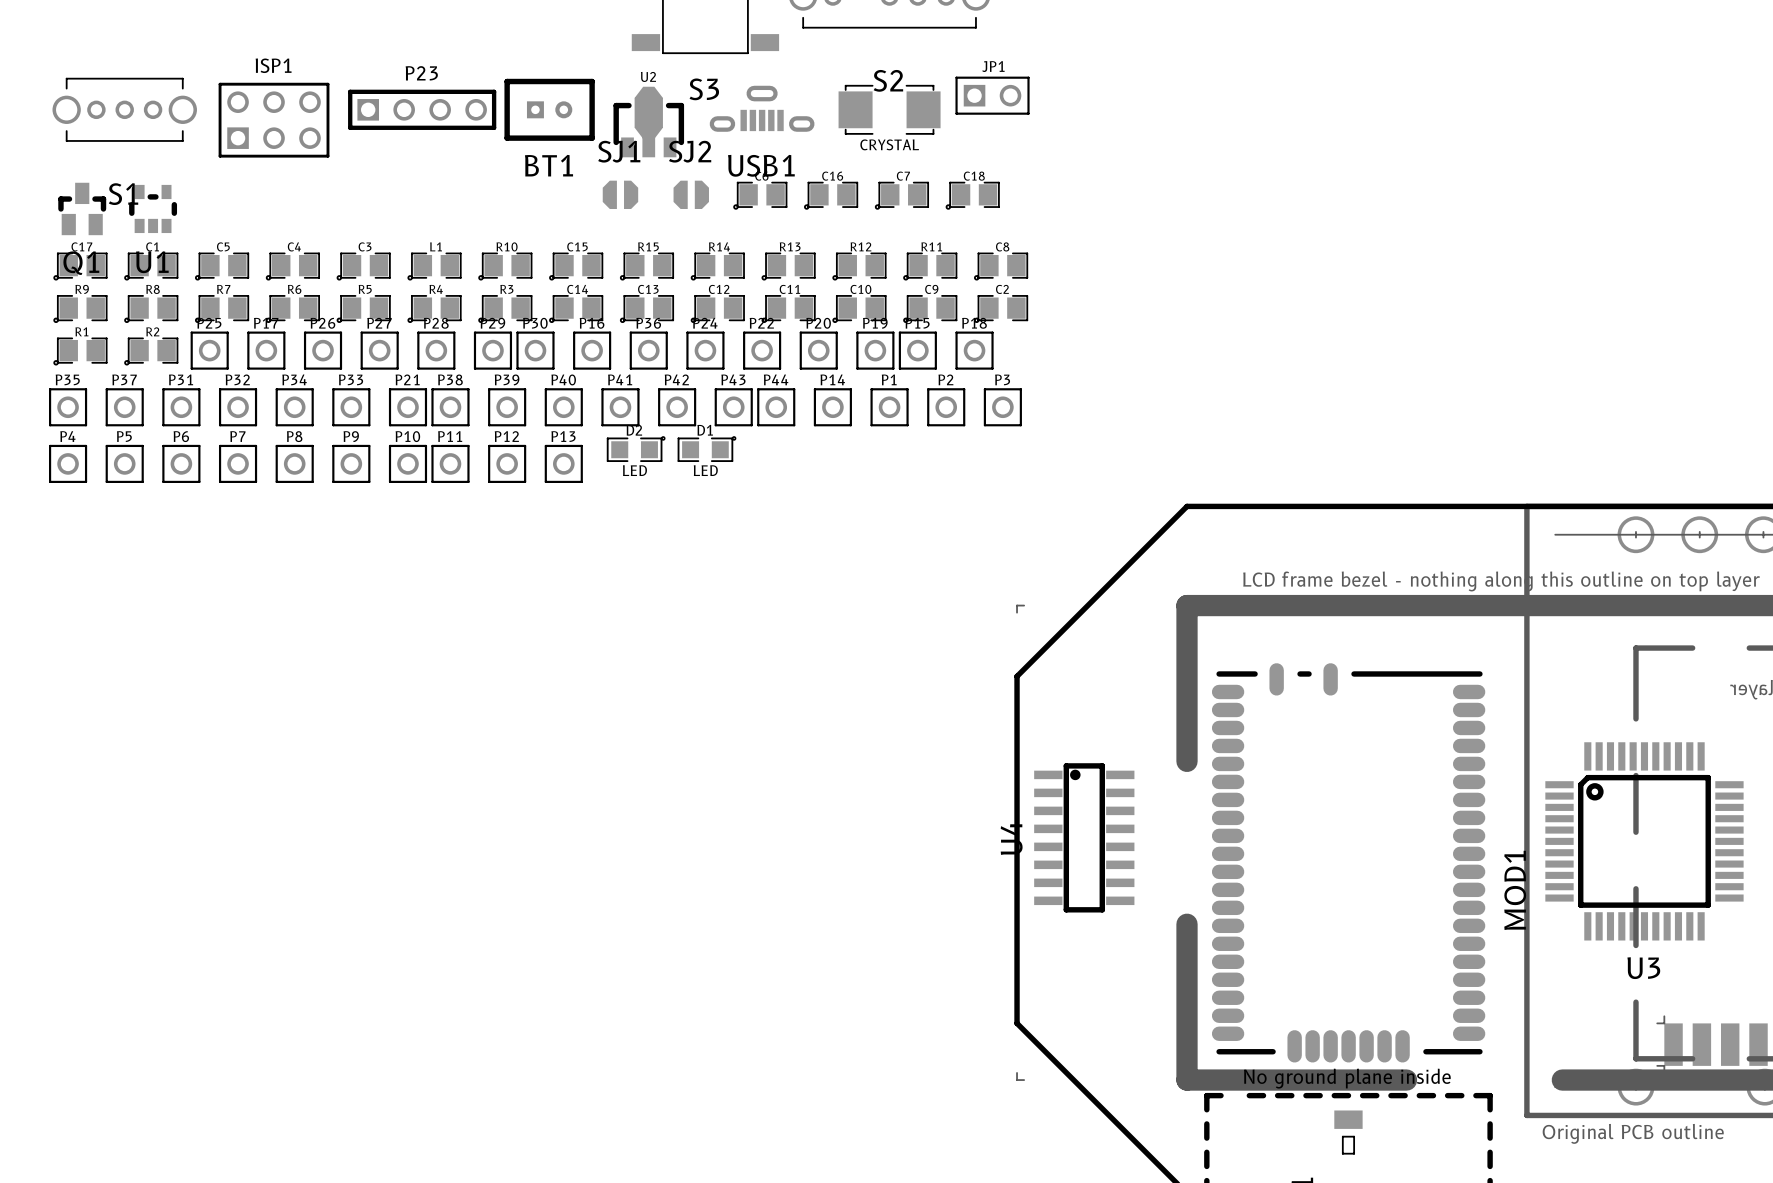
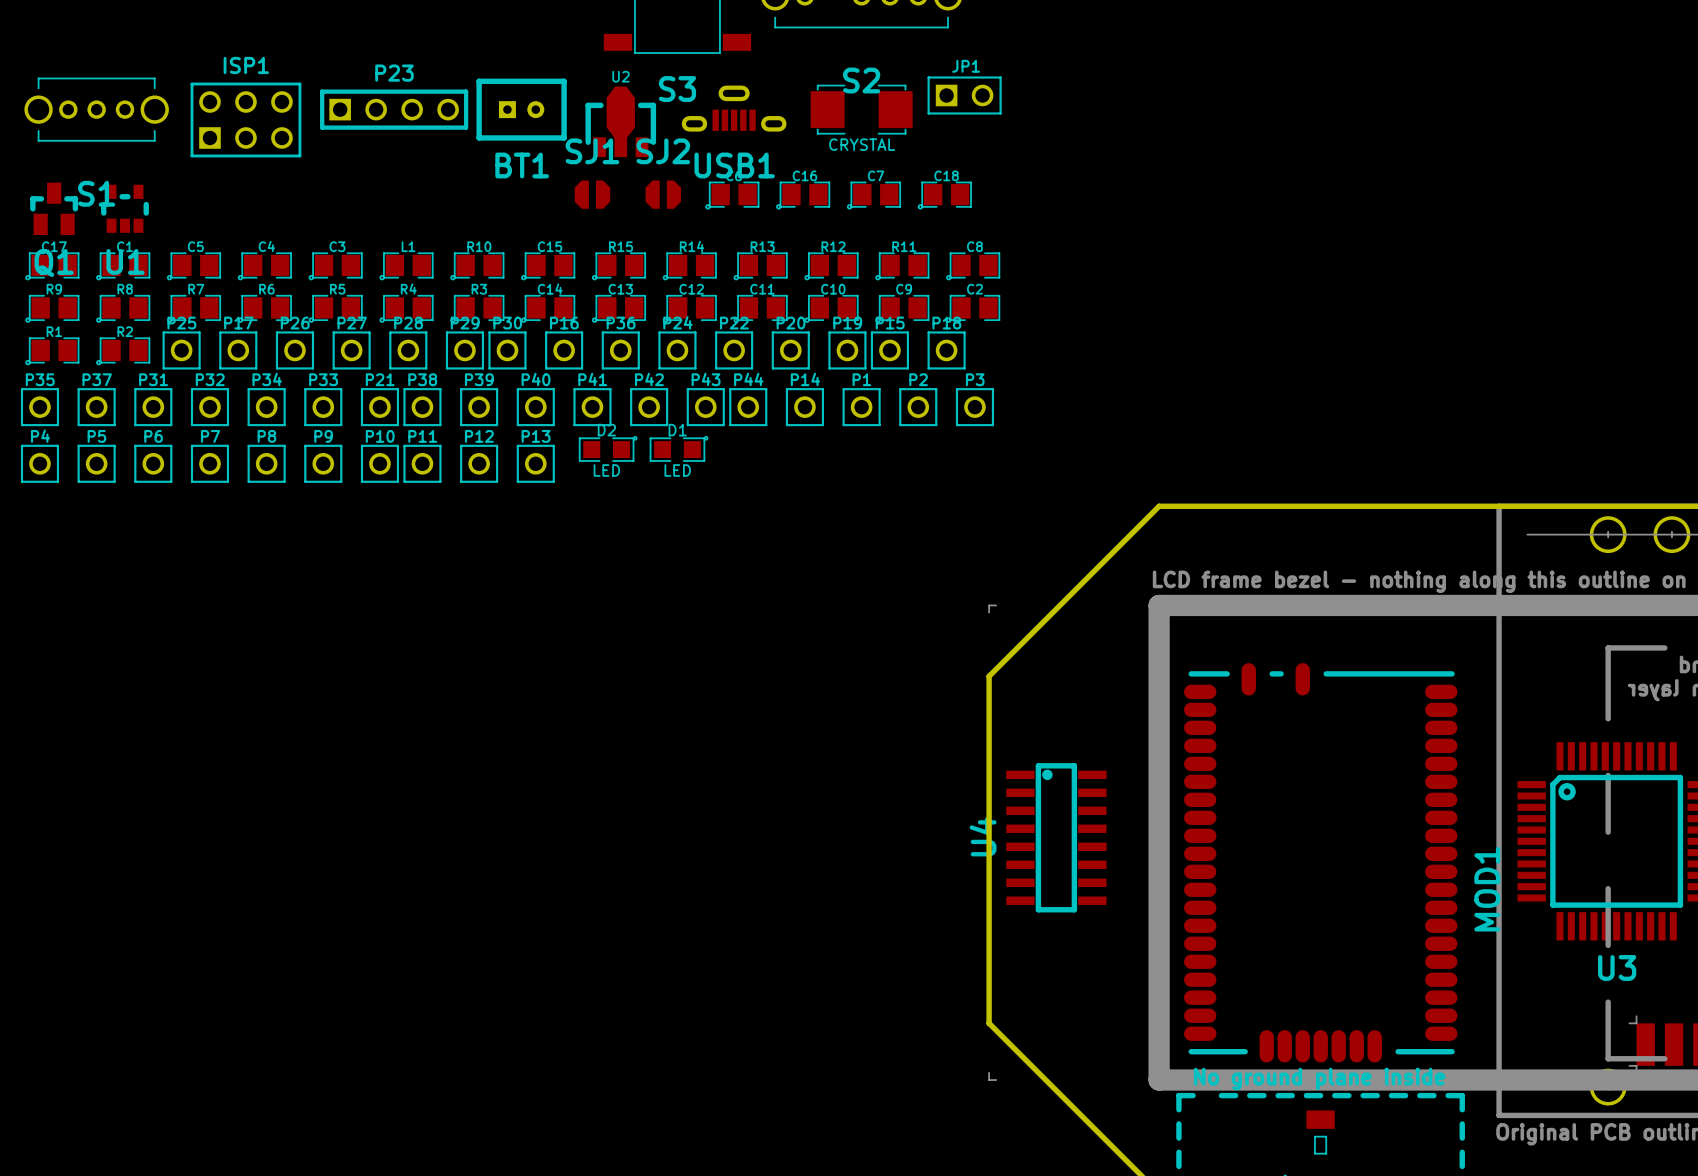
line: none -> (1159, 761) (1159, 924)
line: none -> (1378, 1080) (1534, 1080)

